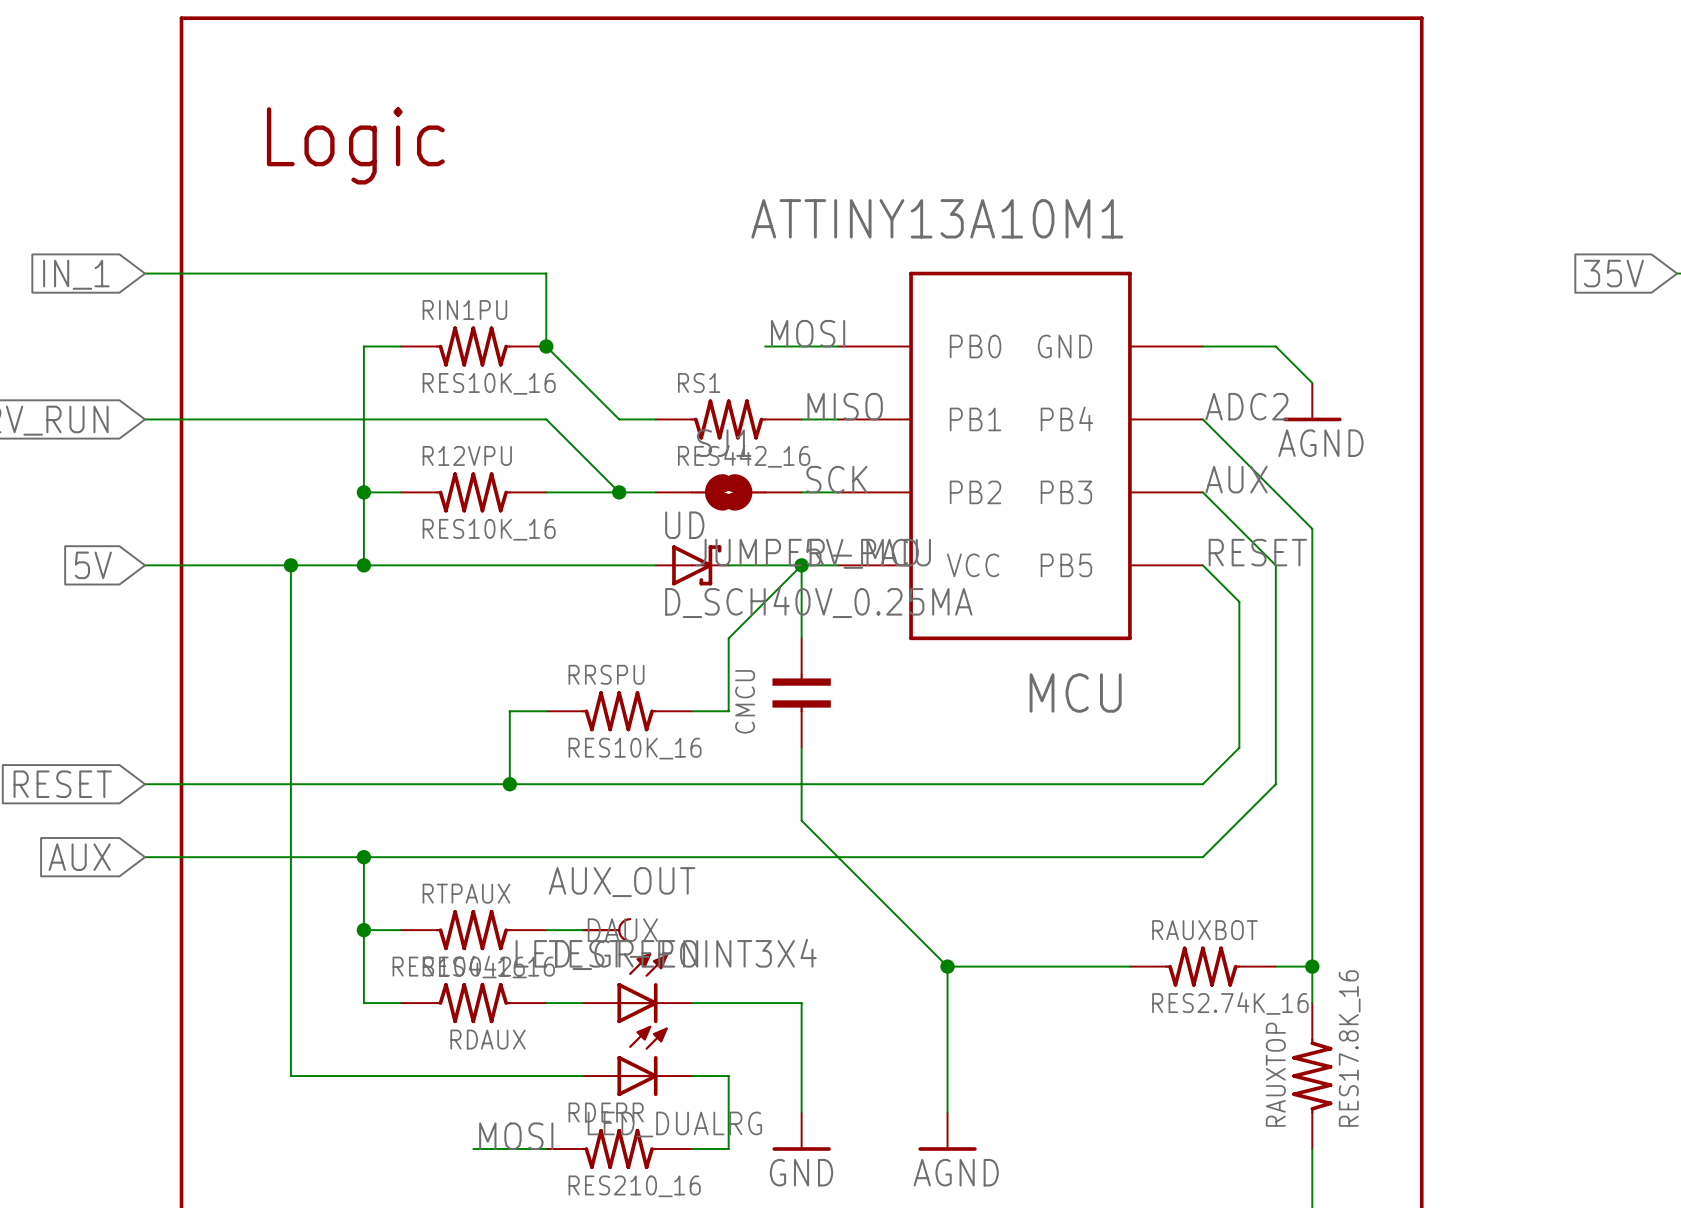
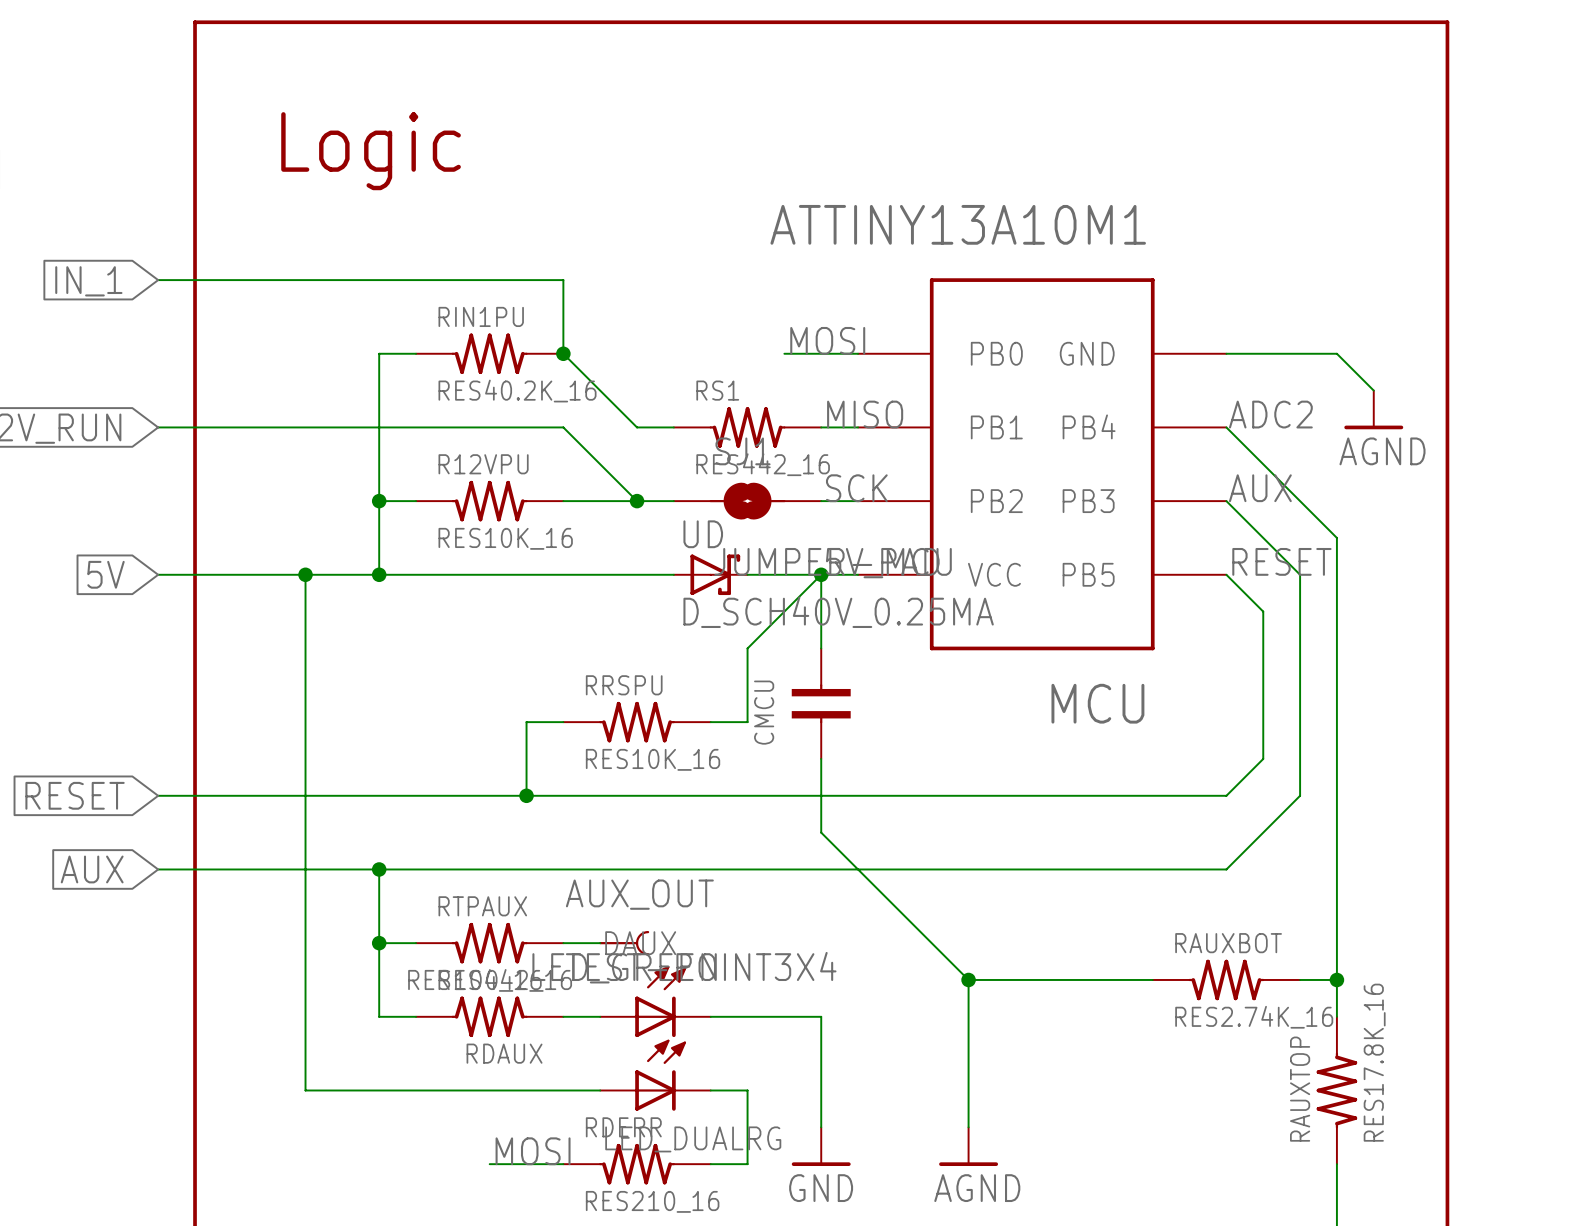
wire: (1275, 346) (1312, 382) -> (1300, 353) (1336, 353) (1373, 390)
RIN1PU value: RES10K_16 (489, 383) -> RES40.2K_16 (517, 391)
power symbol position: AGND (1312, 402) -> AGND (1373, 409)

